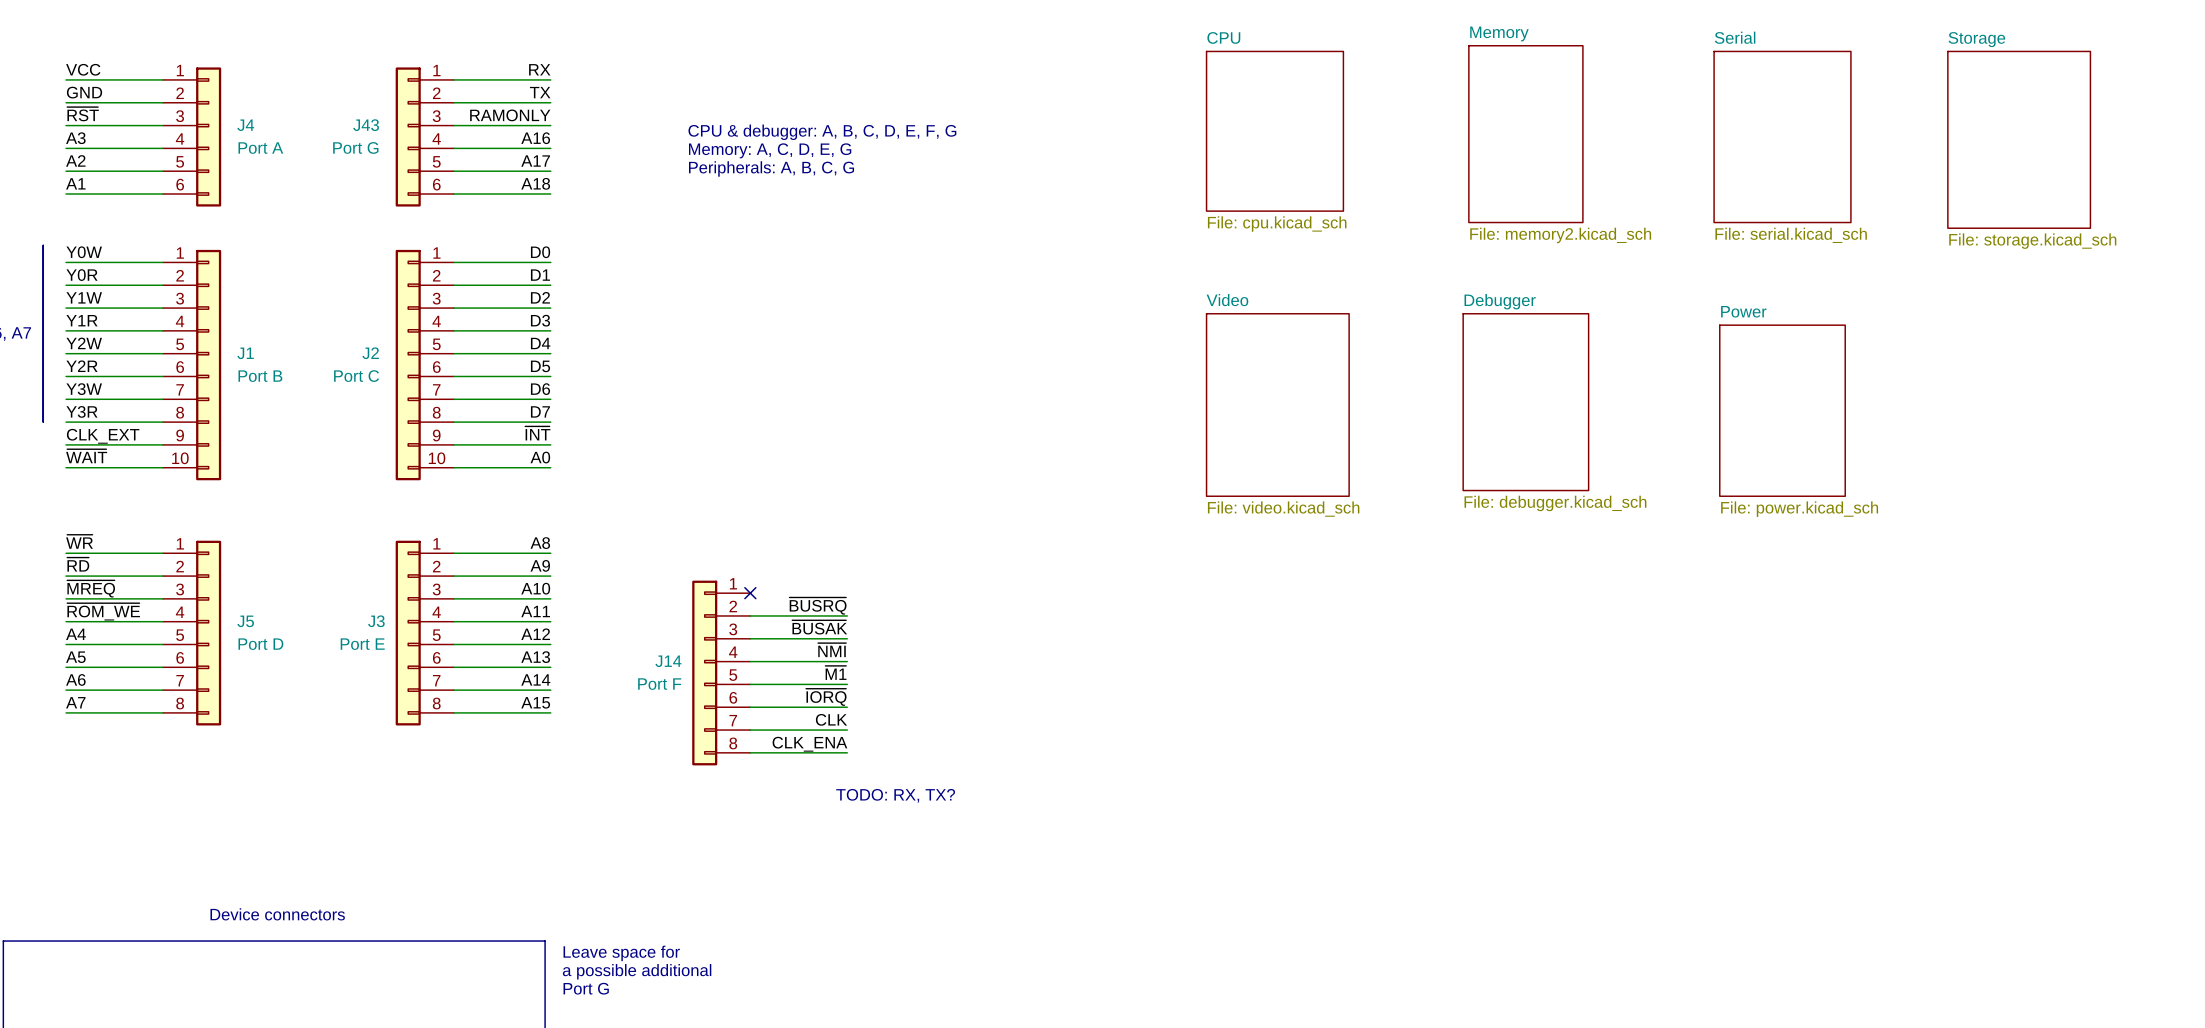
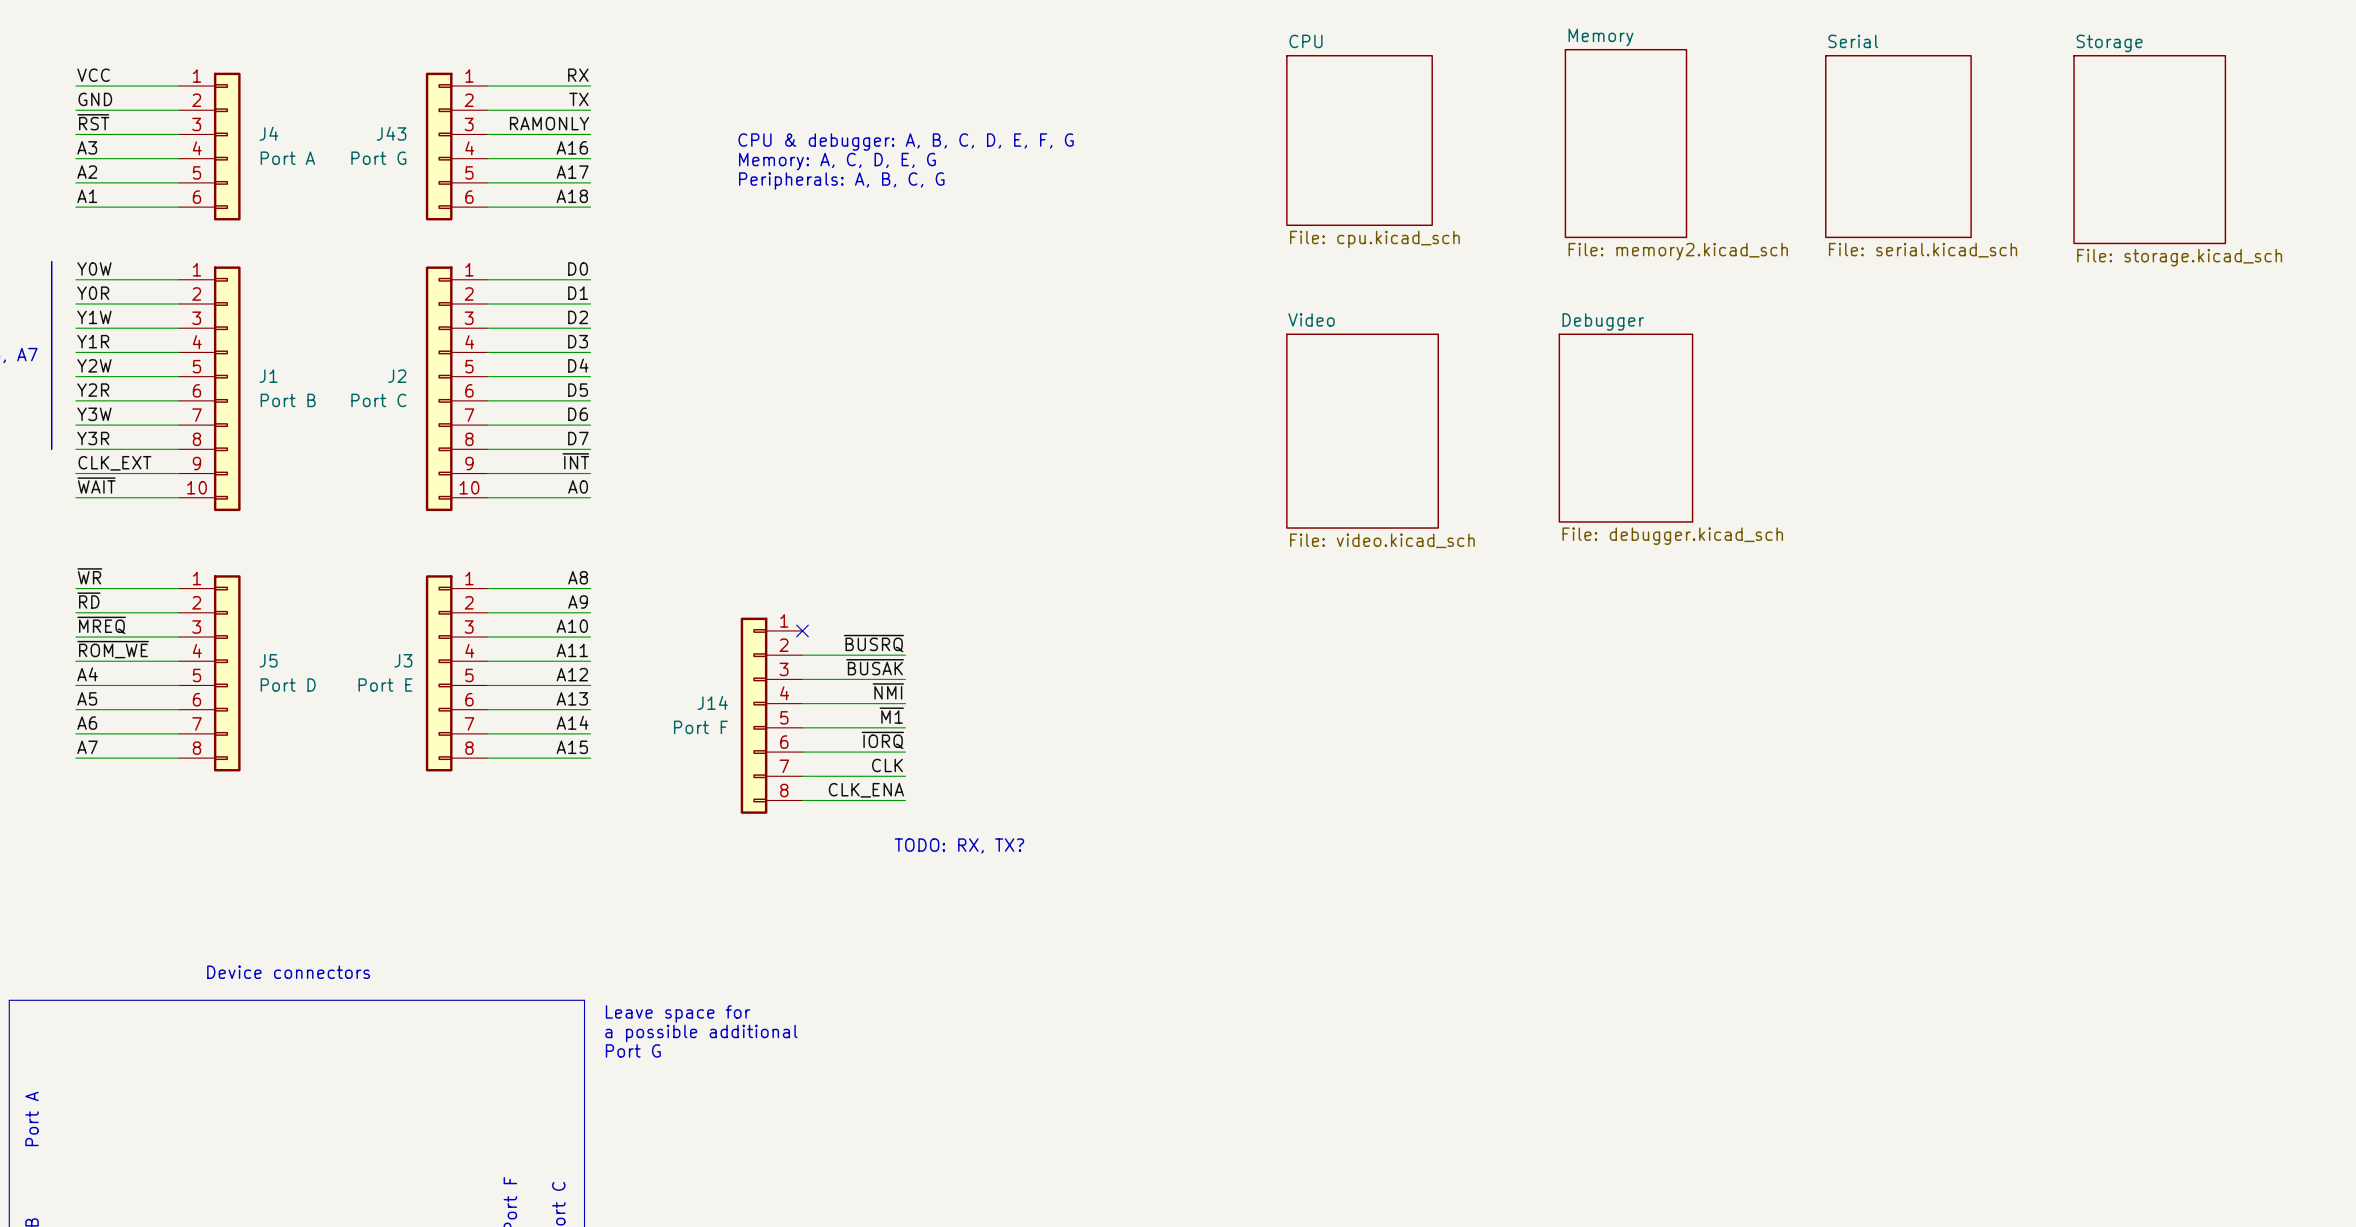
sheet Power: File: power.kicad_sch (1782, 410) -> none

